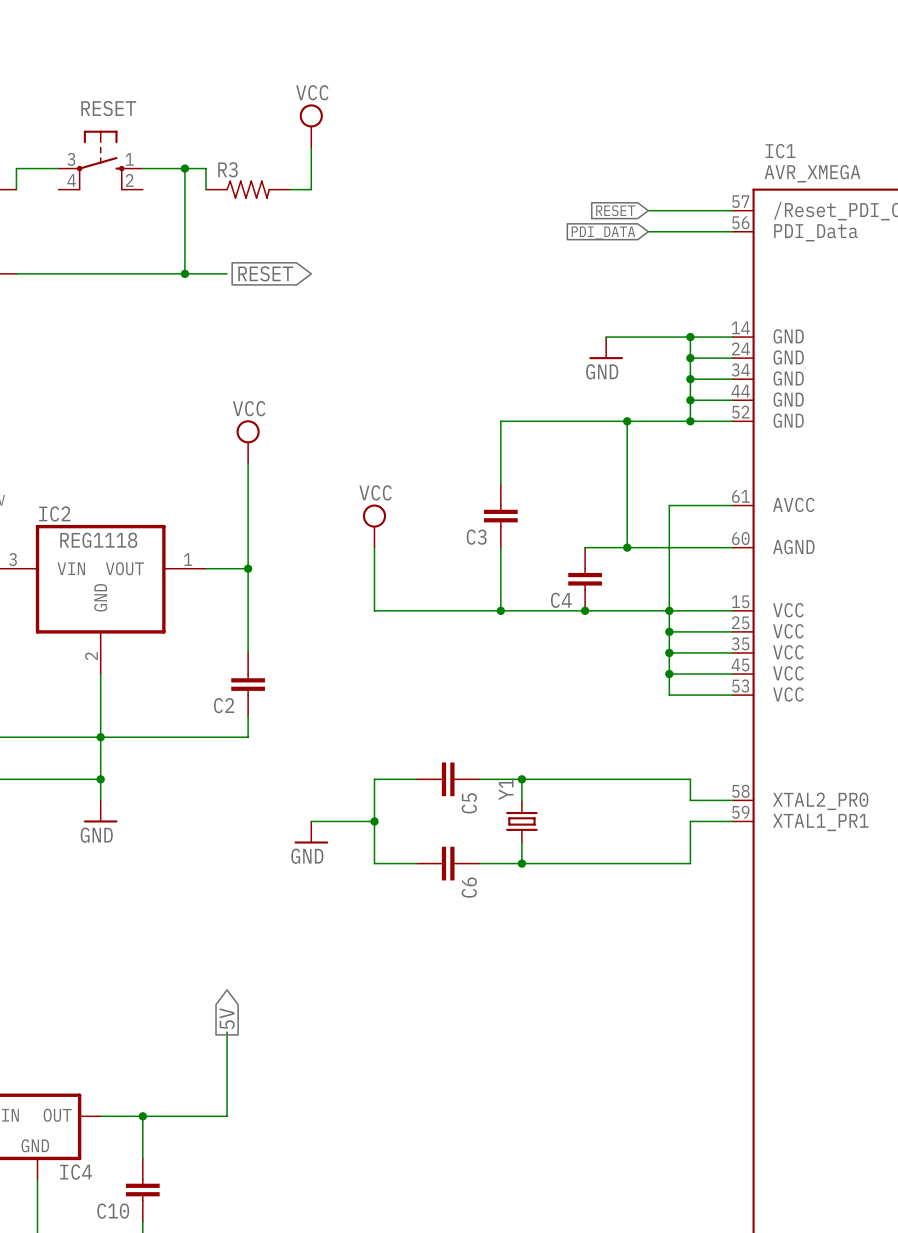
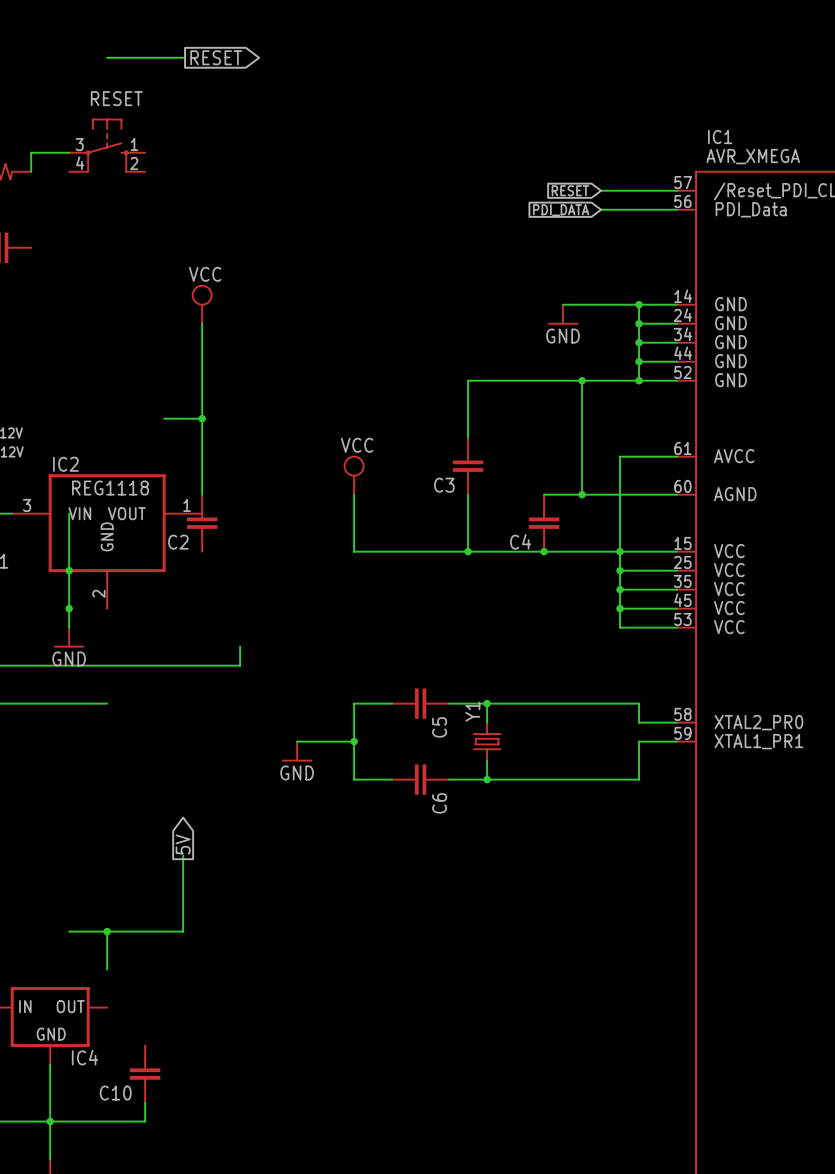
wire: none -> (107, 57) (183, 57)
global label: none -> RESET (216, 57)
power symbol: VCC (311, 125) -> none
wire: (311, 147) (311, 189) (290, 189) -> none
wire: (142, 168) (205, 168) (205, 189) -> none
wire: (184, 168) (184, 273) -> none
junction: (184, 168) -> none
R3: (248, 189) -> none
wire: (16, 273) (227, 273) -> none
junction: (184, 273) -> none
global label: RESET (265, 273) -> none
power symbol position: VCC (248, 441) -> VCC (202, 304)
junction: none -> (202, 418)
wire: (248, 463) (248, 652) -> (202, 323) (202, 494)
wire: (205, 568) (248, 568) -> (164, 418) (202, 418)
junction: (248, 568) -> none
junction: none -> (69, 570)
junction: none -> (69, 608)
wire: (100, 674) (100, 800) -> (69, 513) (69, 627)
C2 position: (248, 684) -> (202, 523)
junction: (100, 737) -> none
junction: (100, 779) -> none
power symbol position: GND (100, 811) -> GND (69, 637)
global label position: 5V (227, 1018) -> 5V (183, 844)
junction: none -> (107, 931)
wire: (227, 1032) (227, 1116) (100, 1116) -> (183, 855) (183, 931) (69, 931)
wire: (142, 1116) (142, 1158) -> (107, 931) (107, 969)
junction: (142, 1116) -> none

